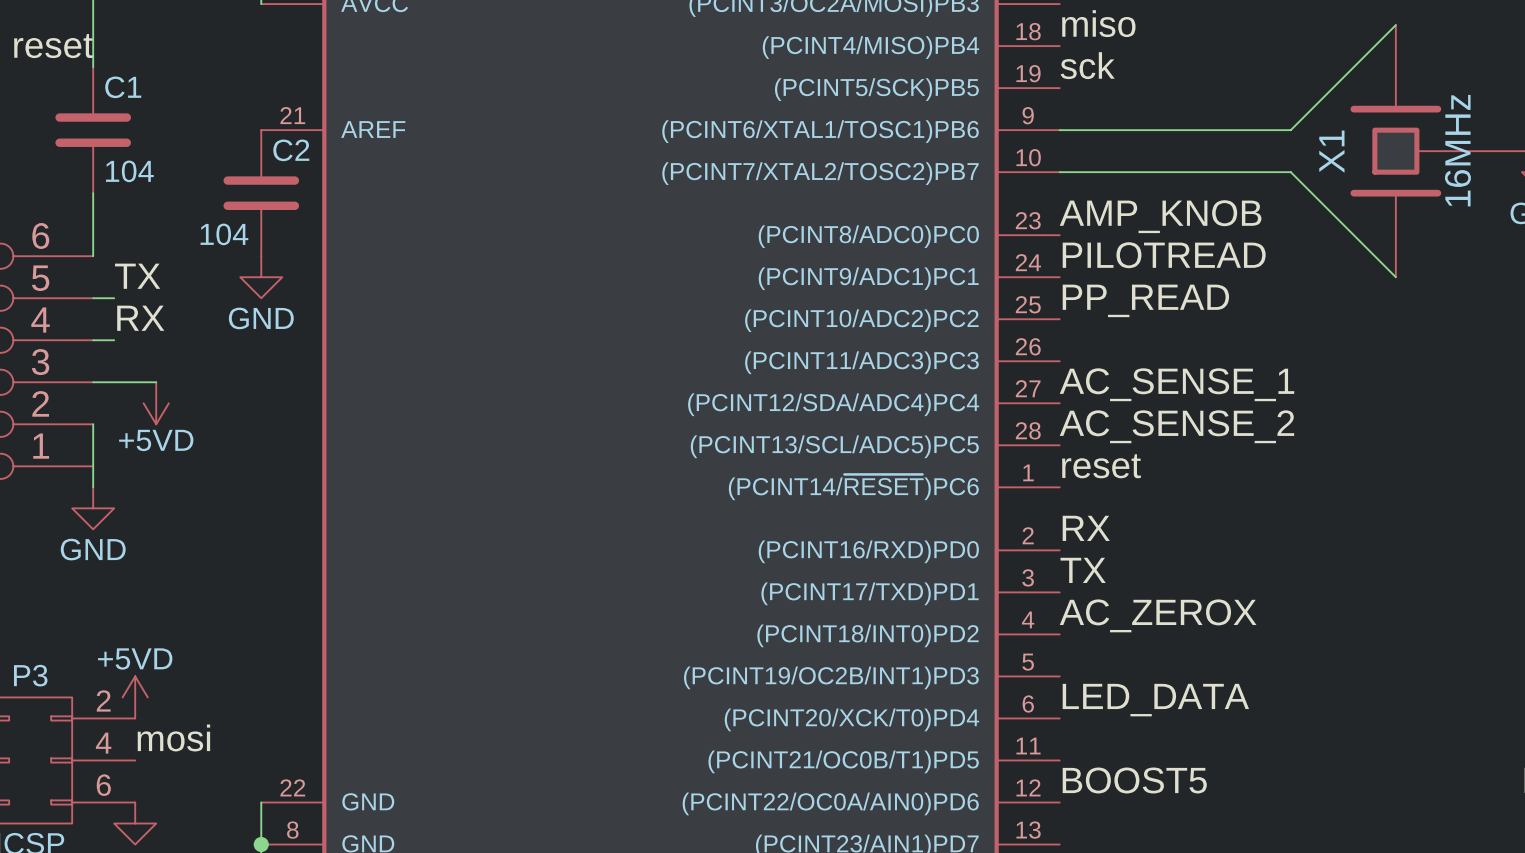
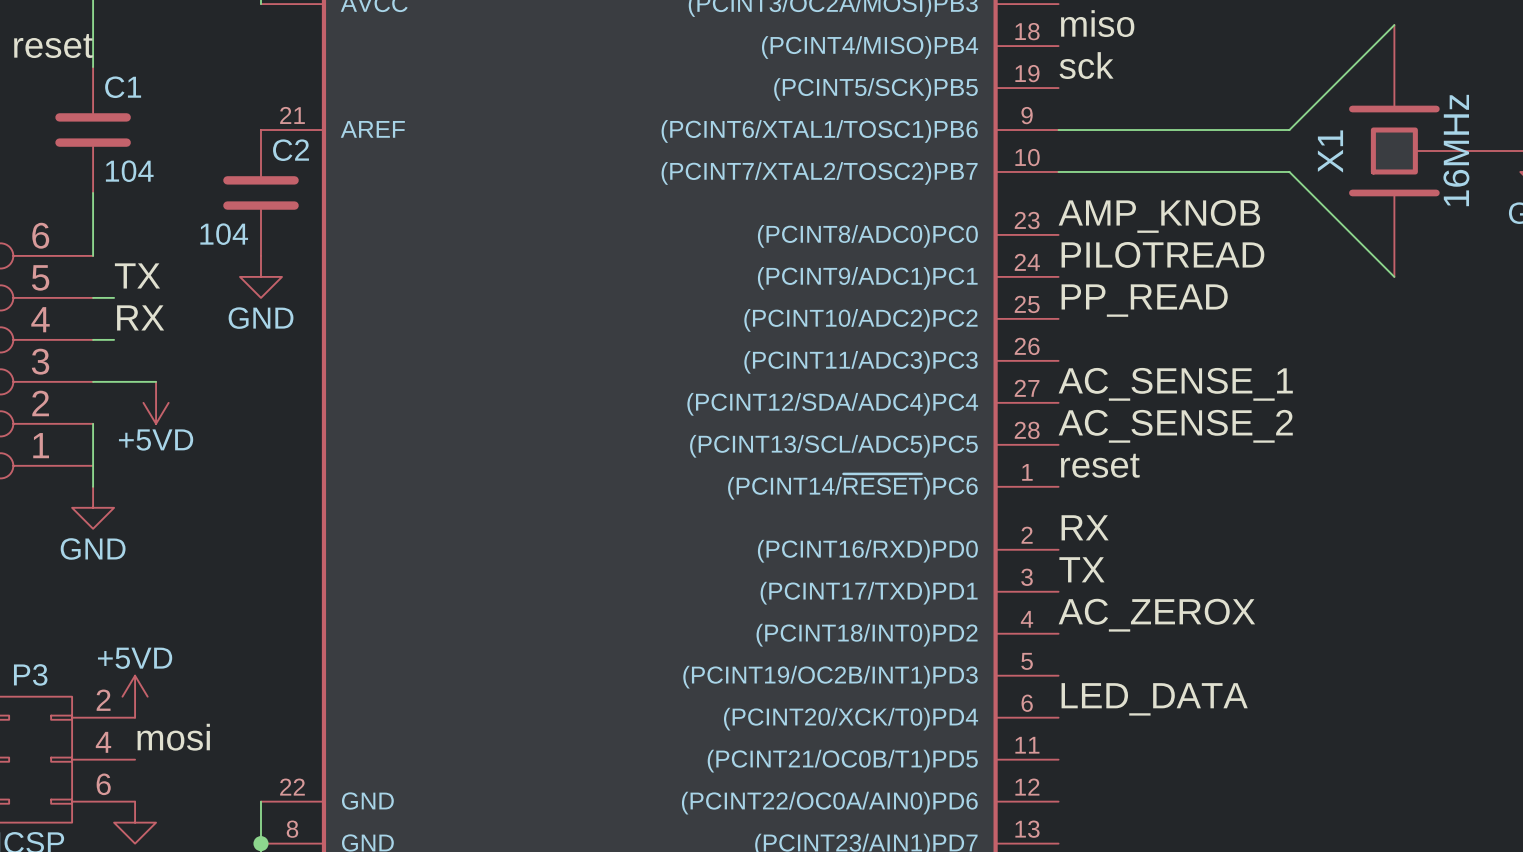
label: BOOST5 (1134, 780) -> none

